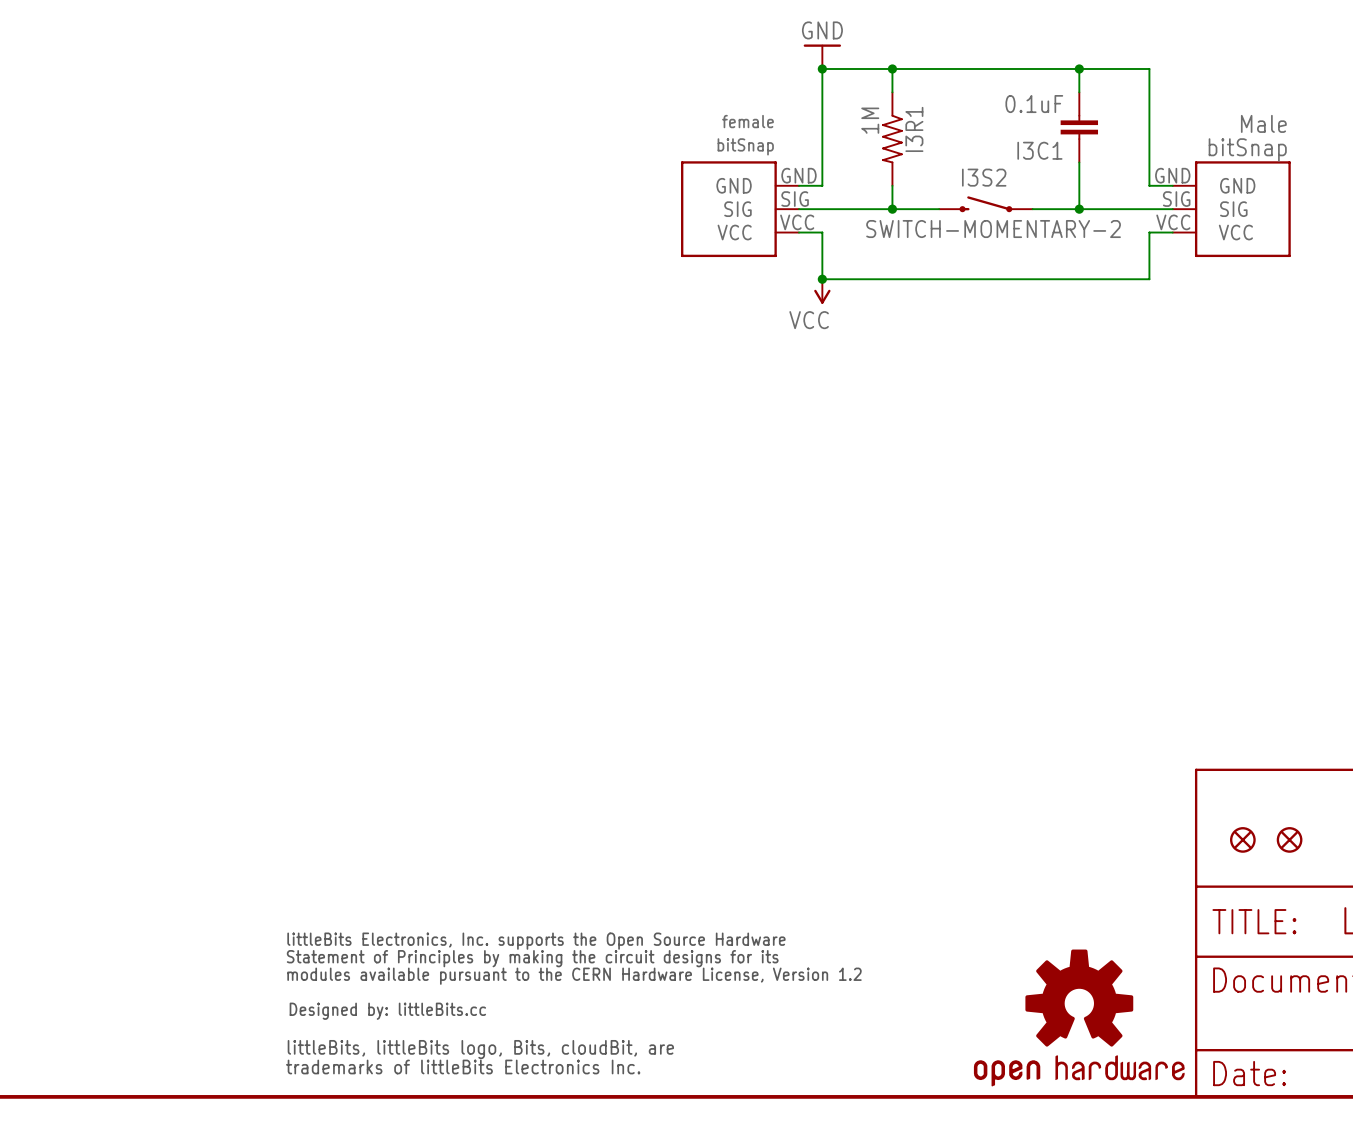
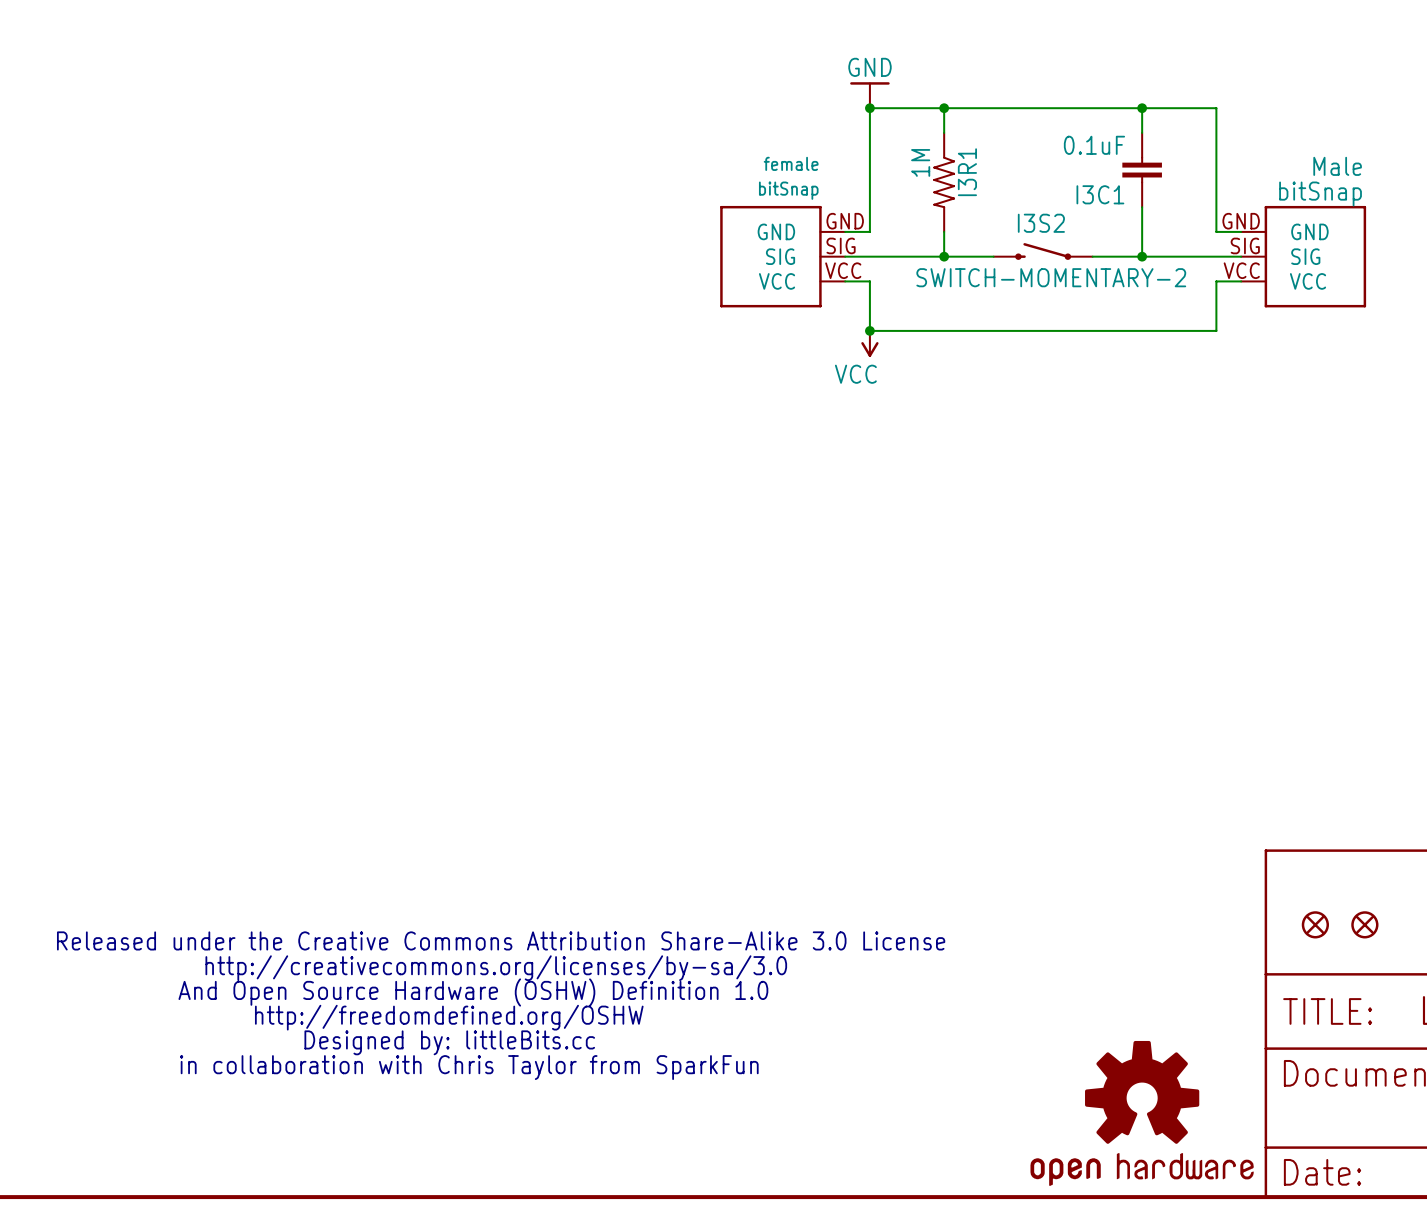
part: none -> (501, 1005)
part: (573, 1003) -> none

